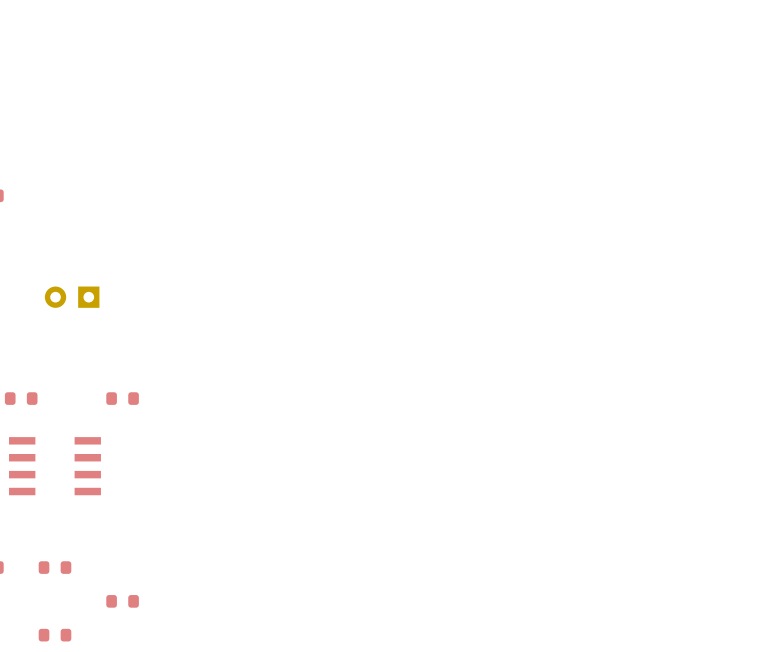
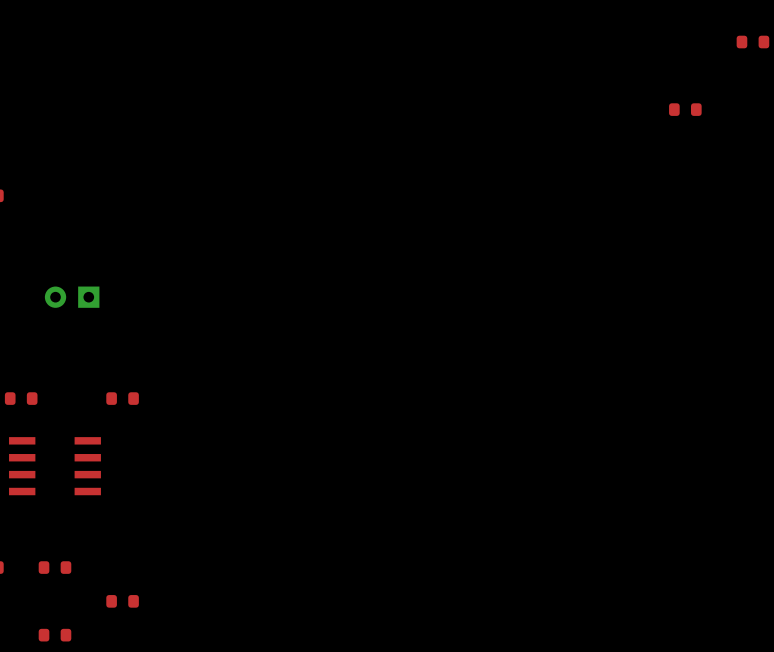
part: none -> (752, 42)
part: none -> (685, 109)

